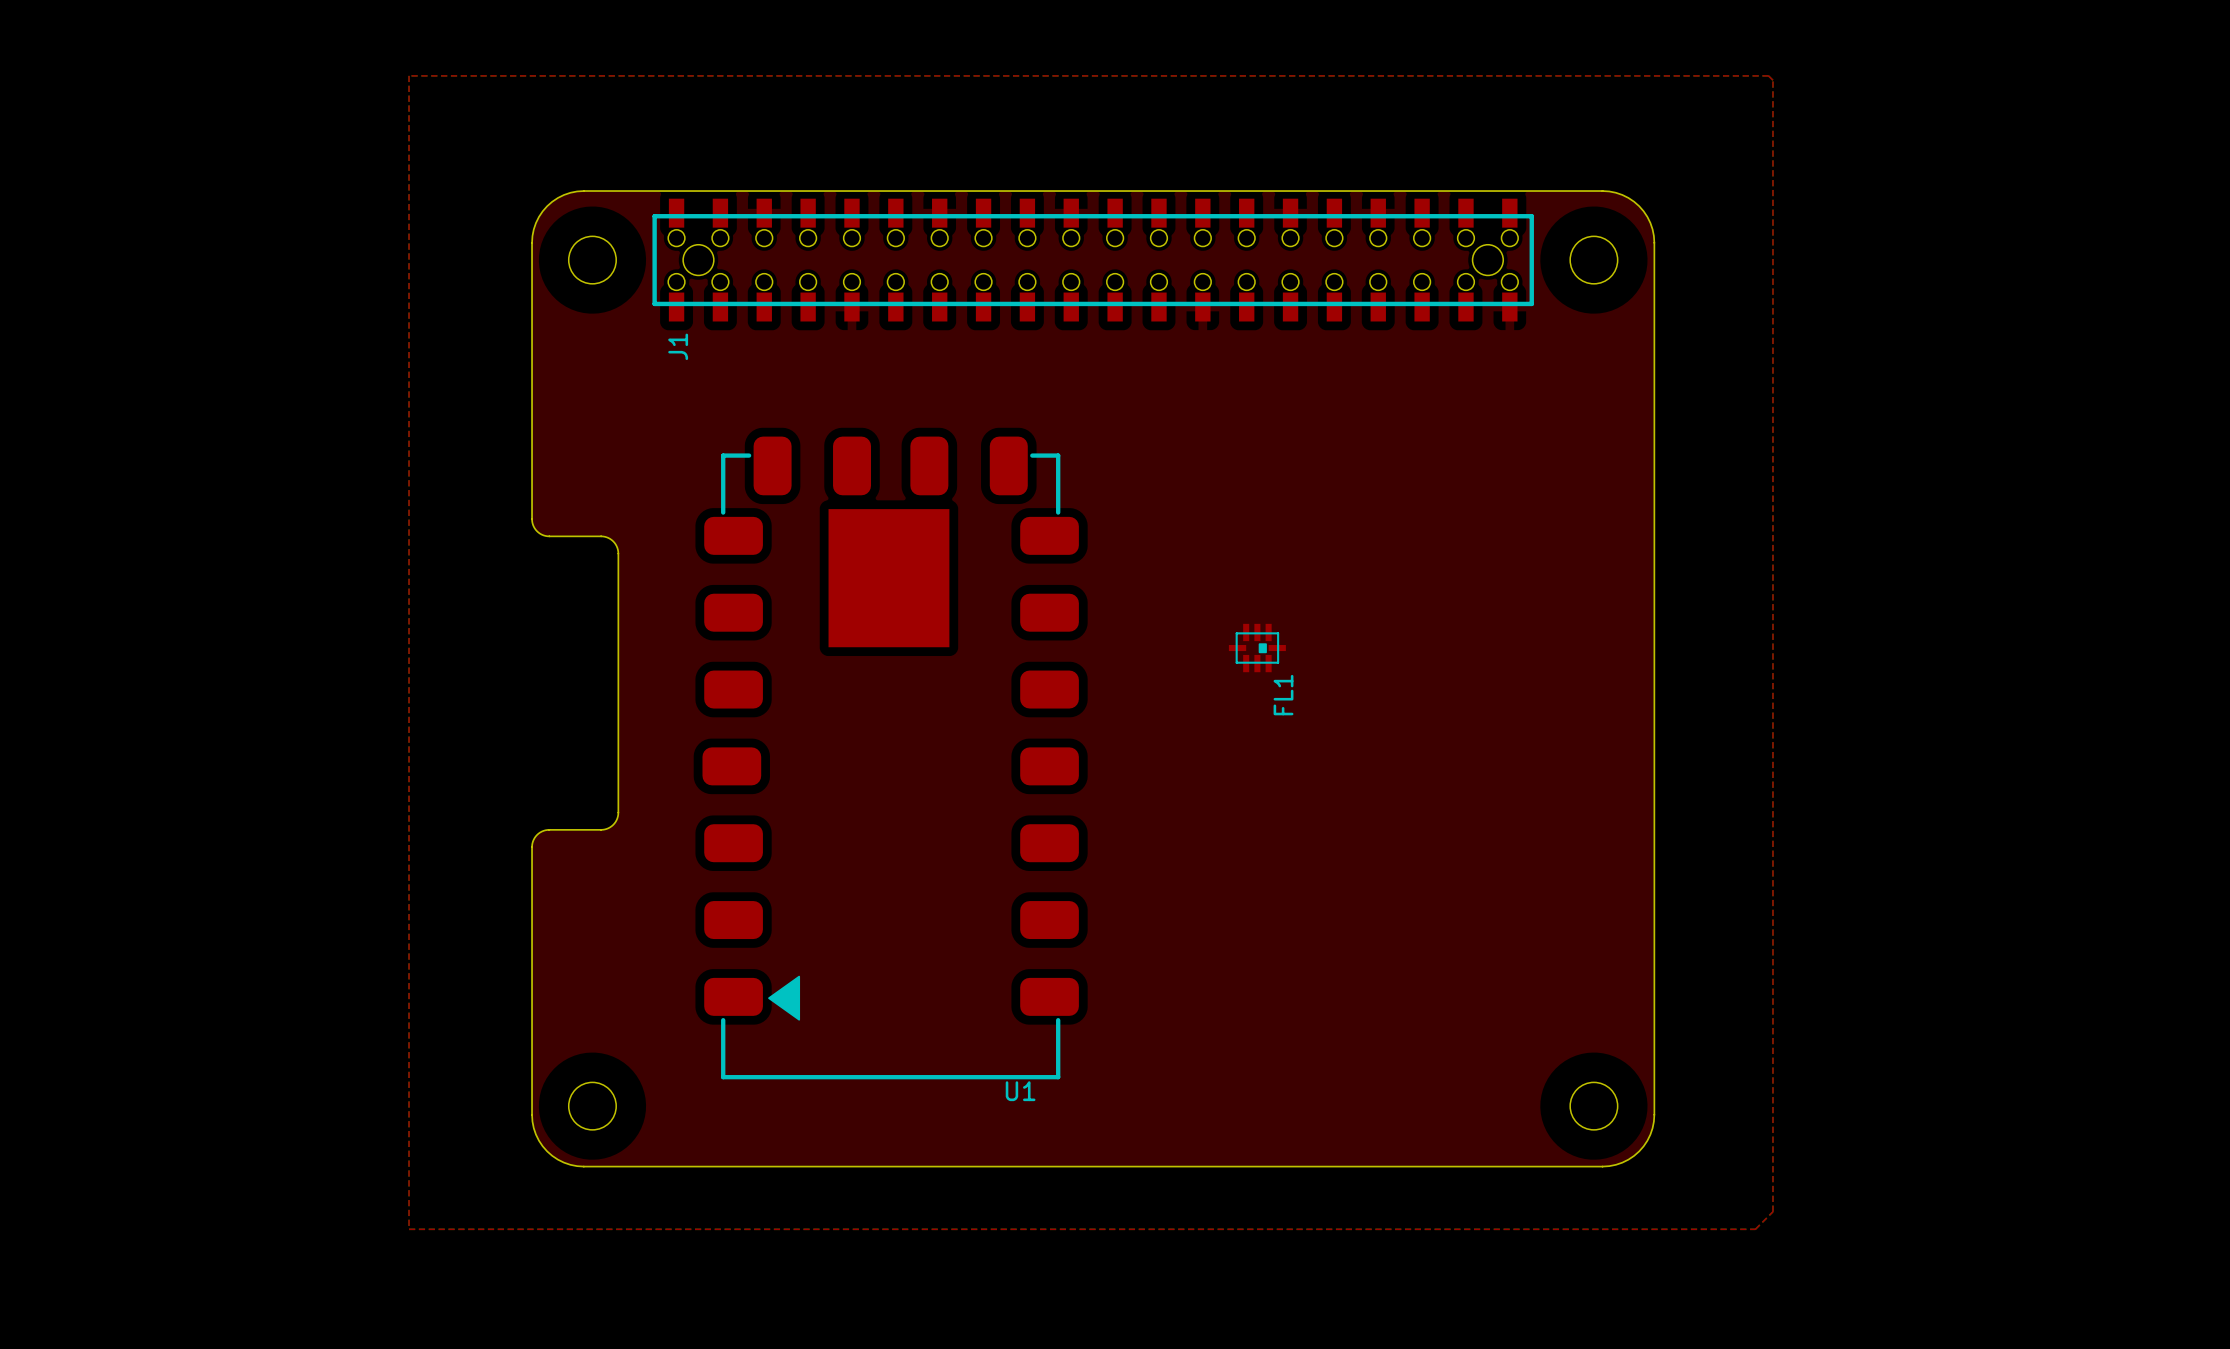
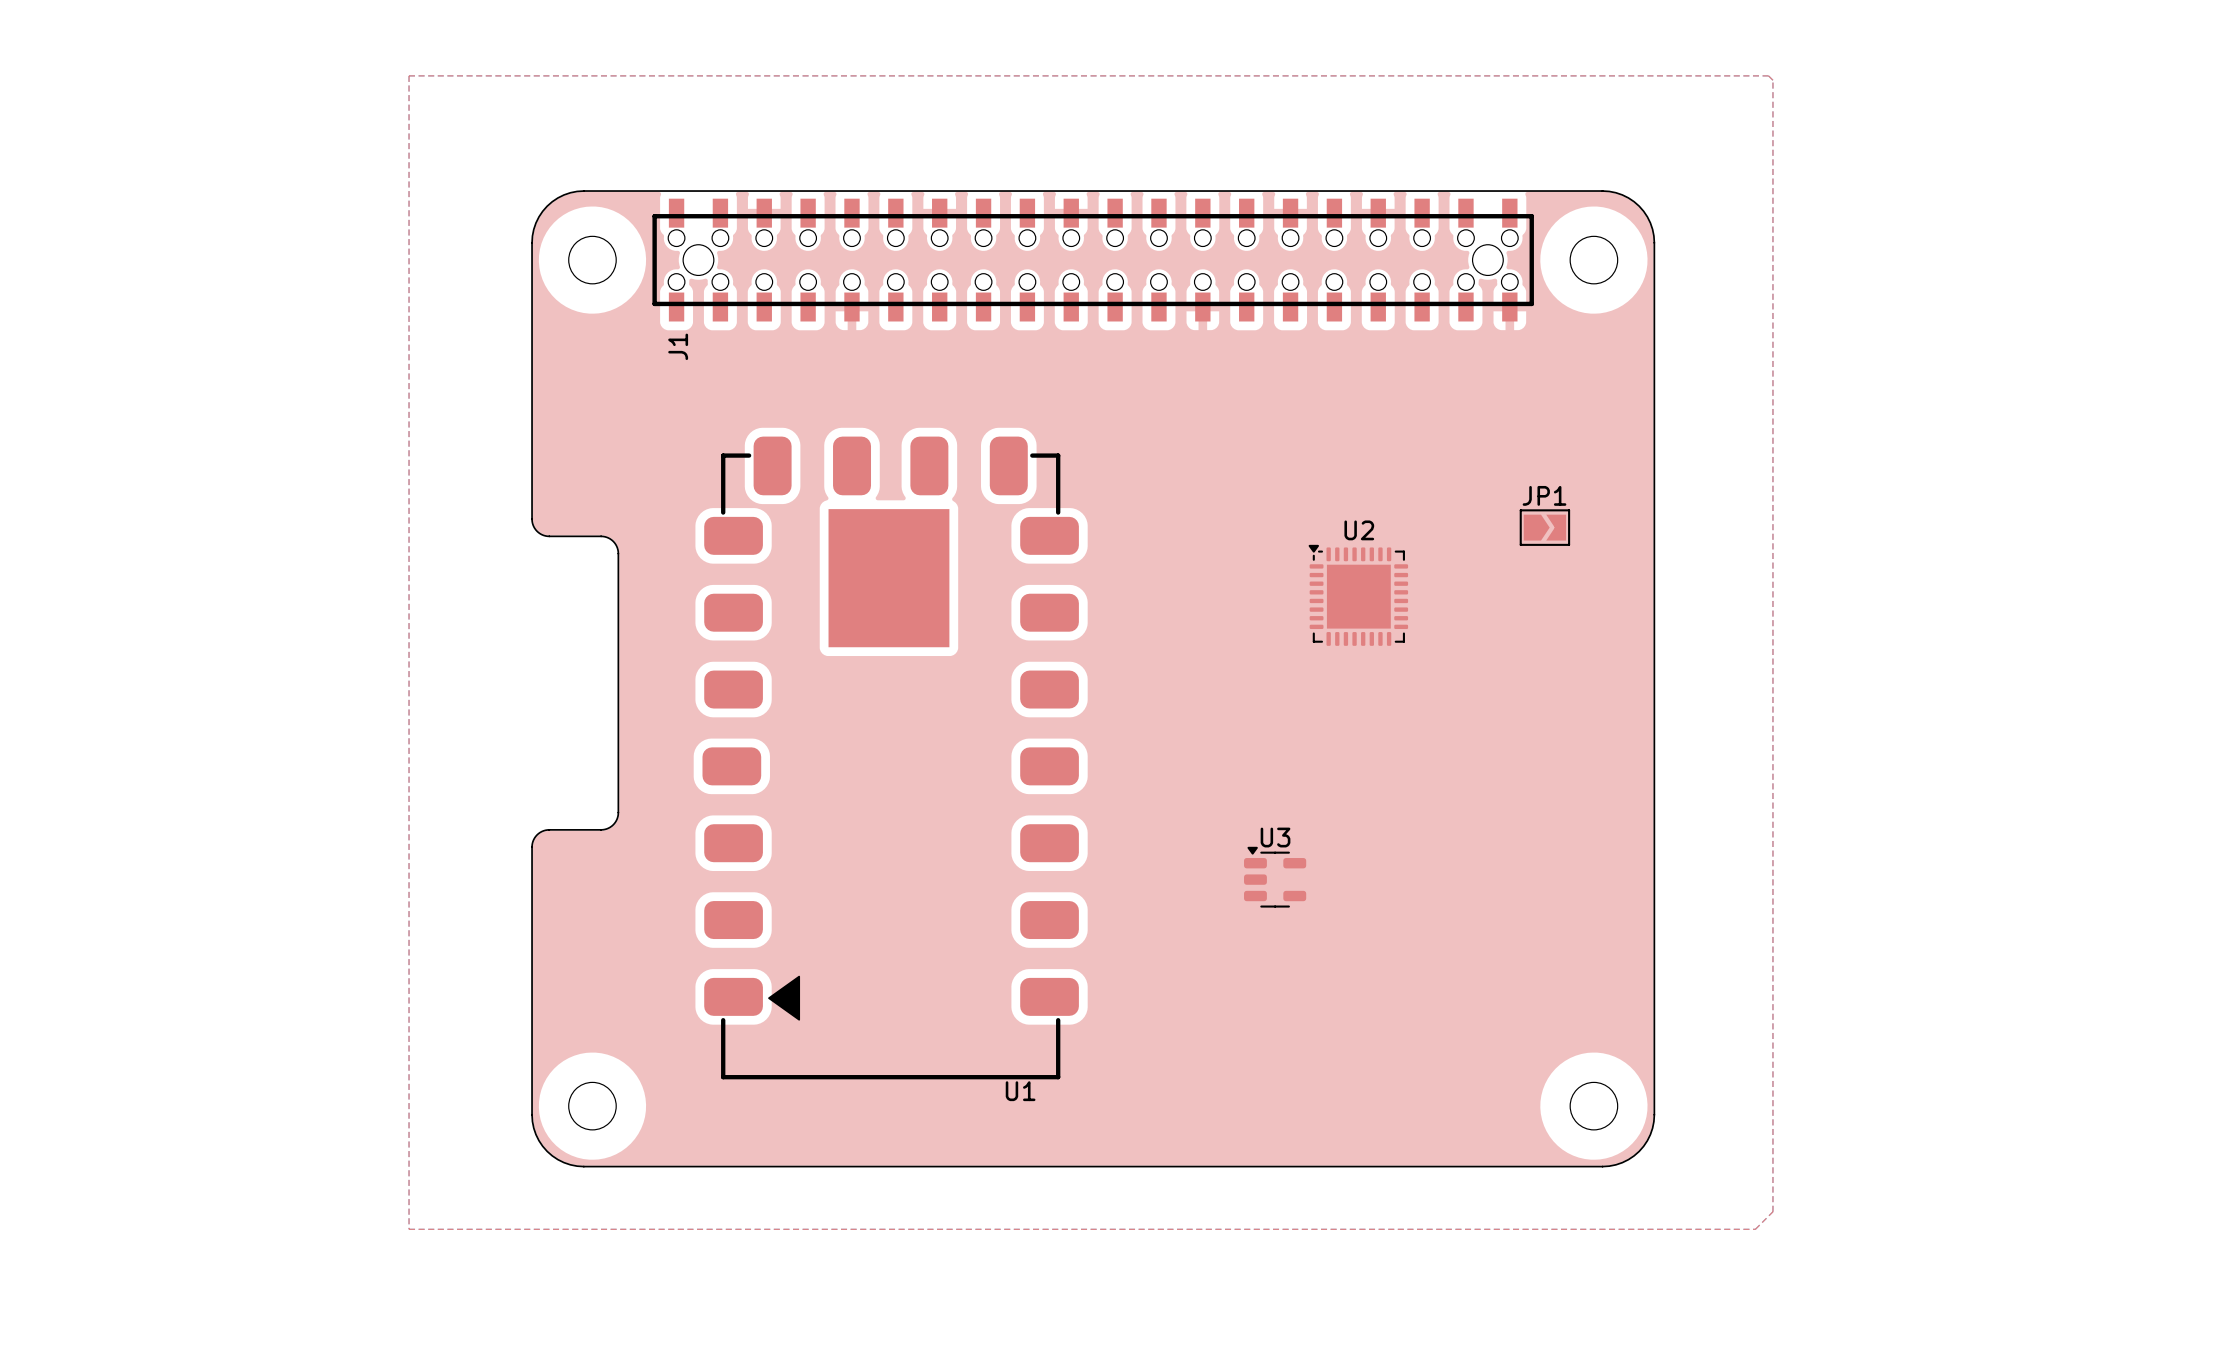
JP1: none -> (1544, 527)
U2: none -> (1358, 595)
FL1: (1257, 648) -> none
U3: none -> (1275, 877)

